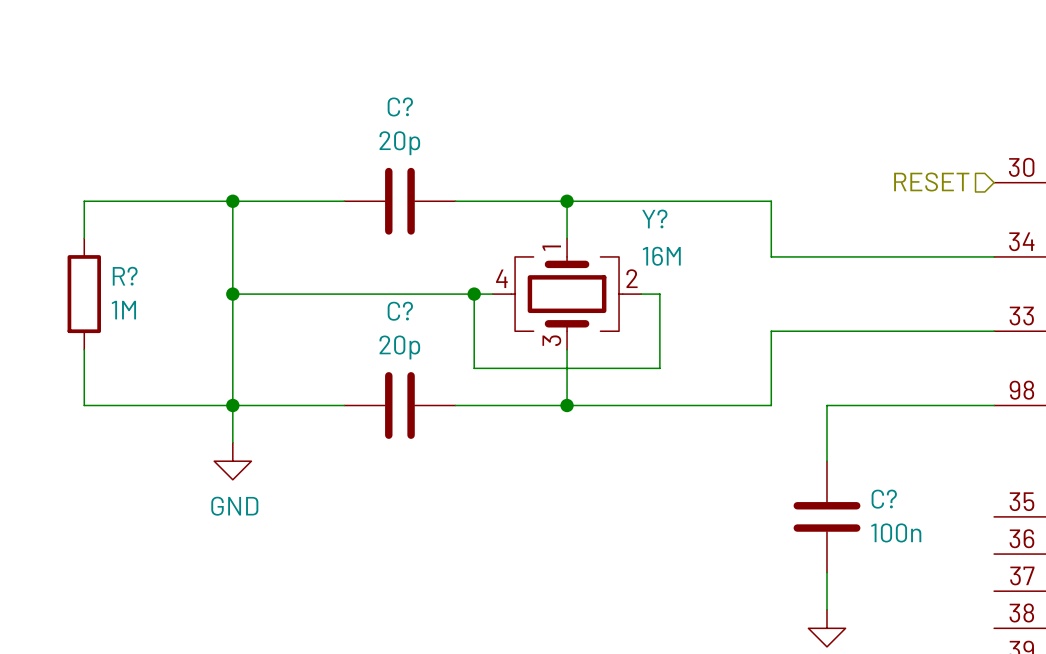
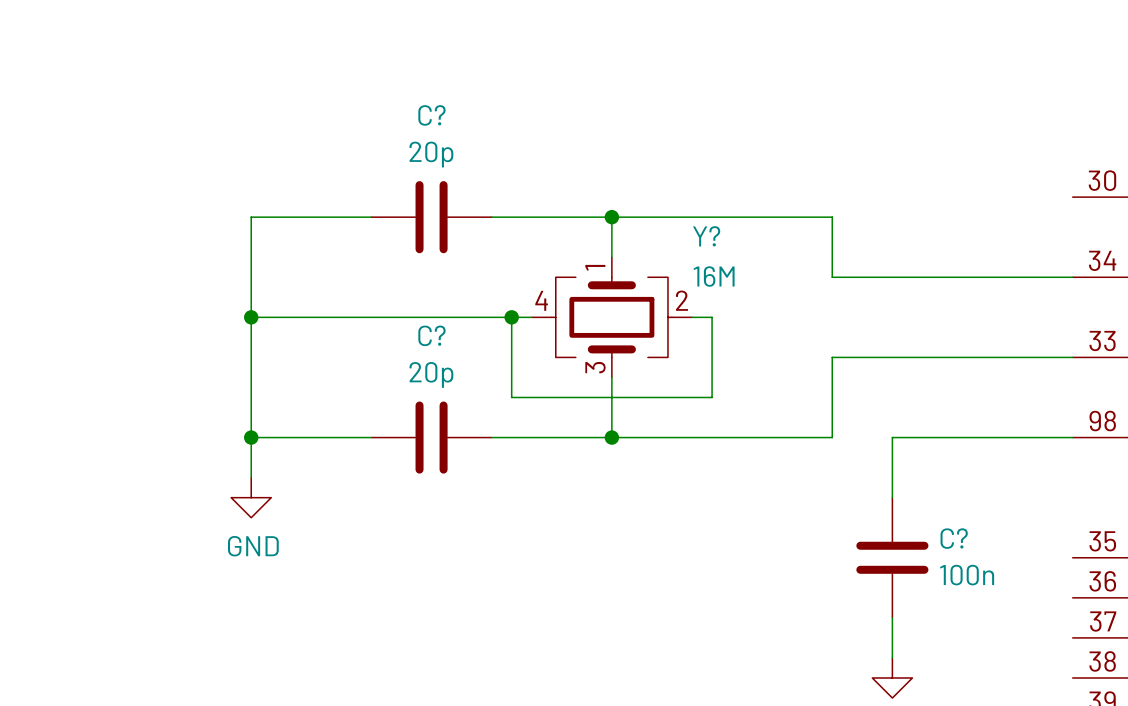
hierarchical label: RESET (931, 181) -> none
wire: (232, 201) (84, 201) (84, 238) -> none
junction: (232, 201) -> none
R?: 1M (84, 294) -> none
wire: (84, 349) (84, 405) (232, 405) -> none

